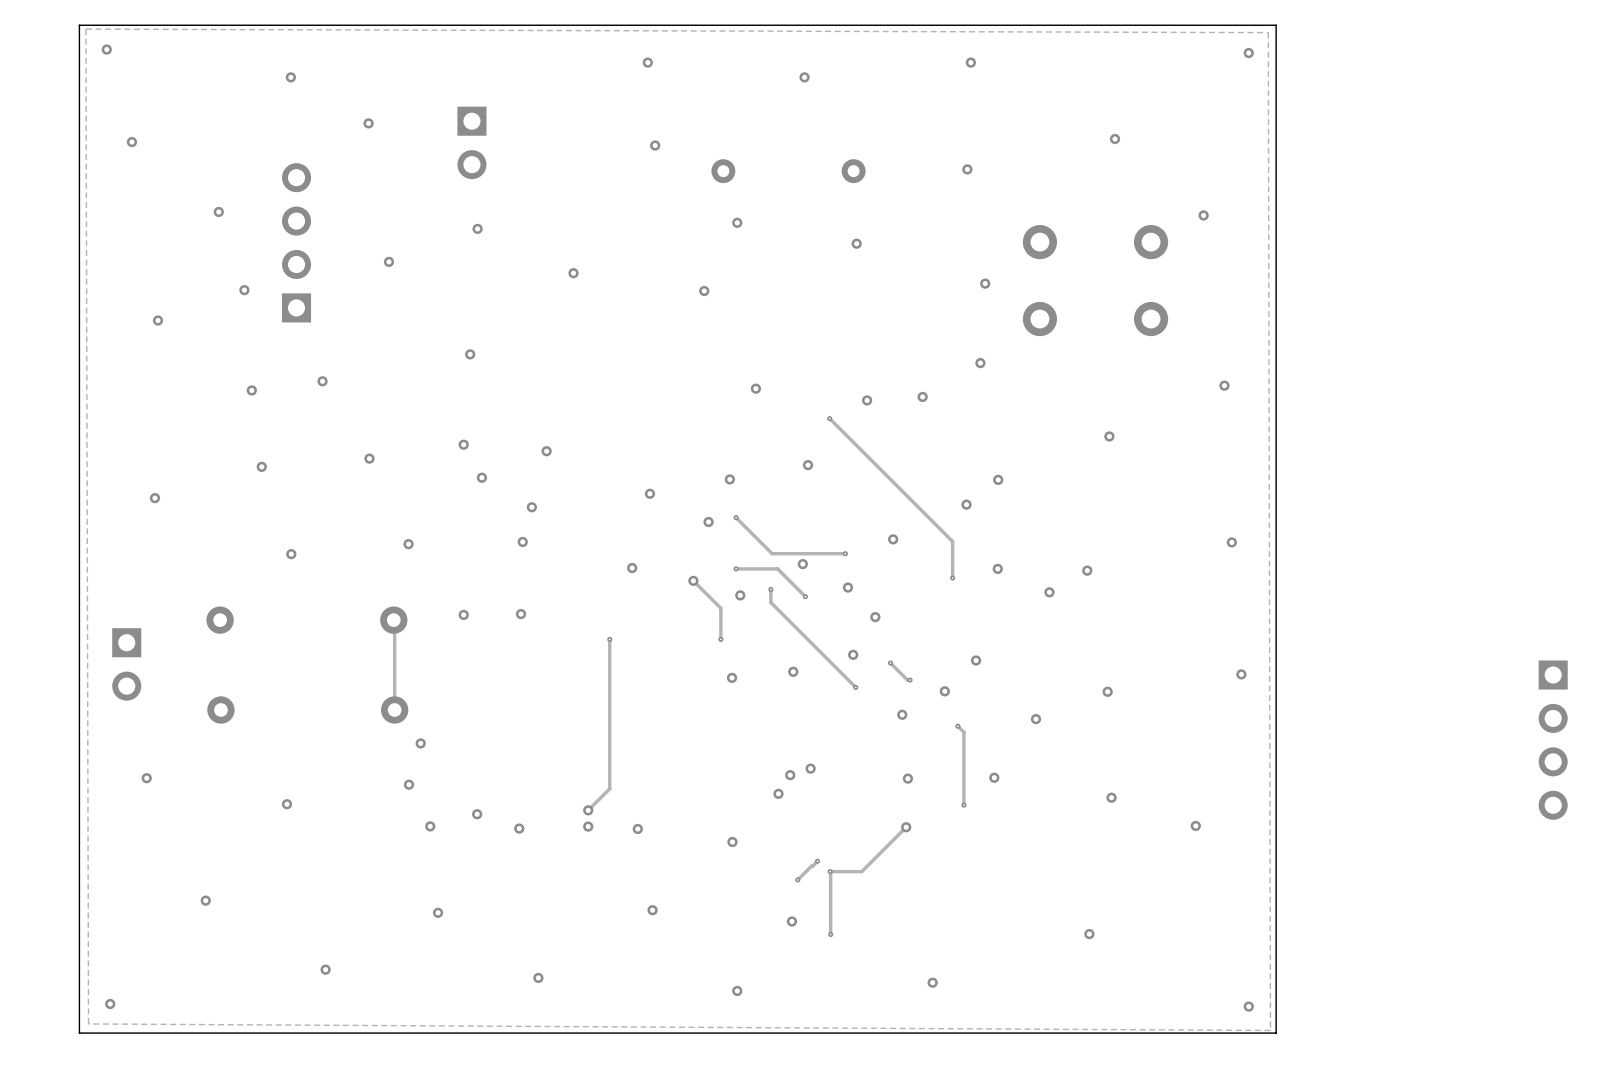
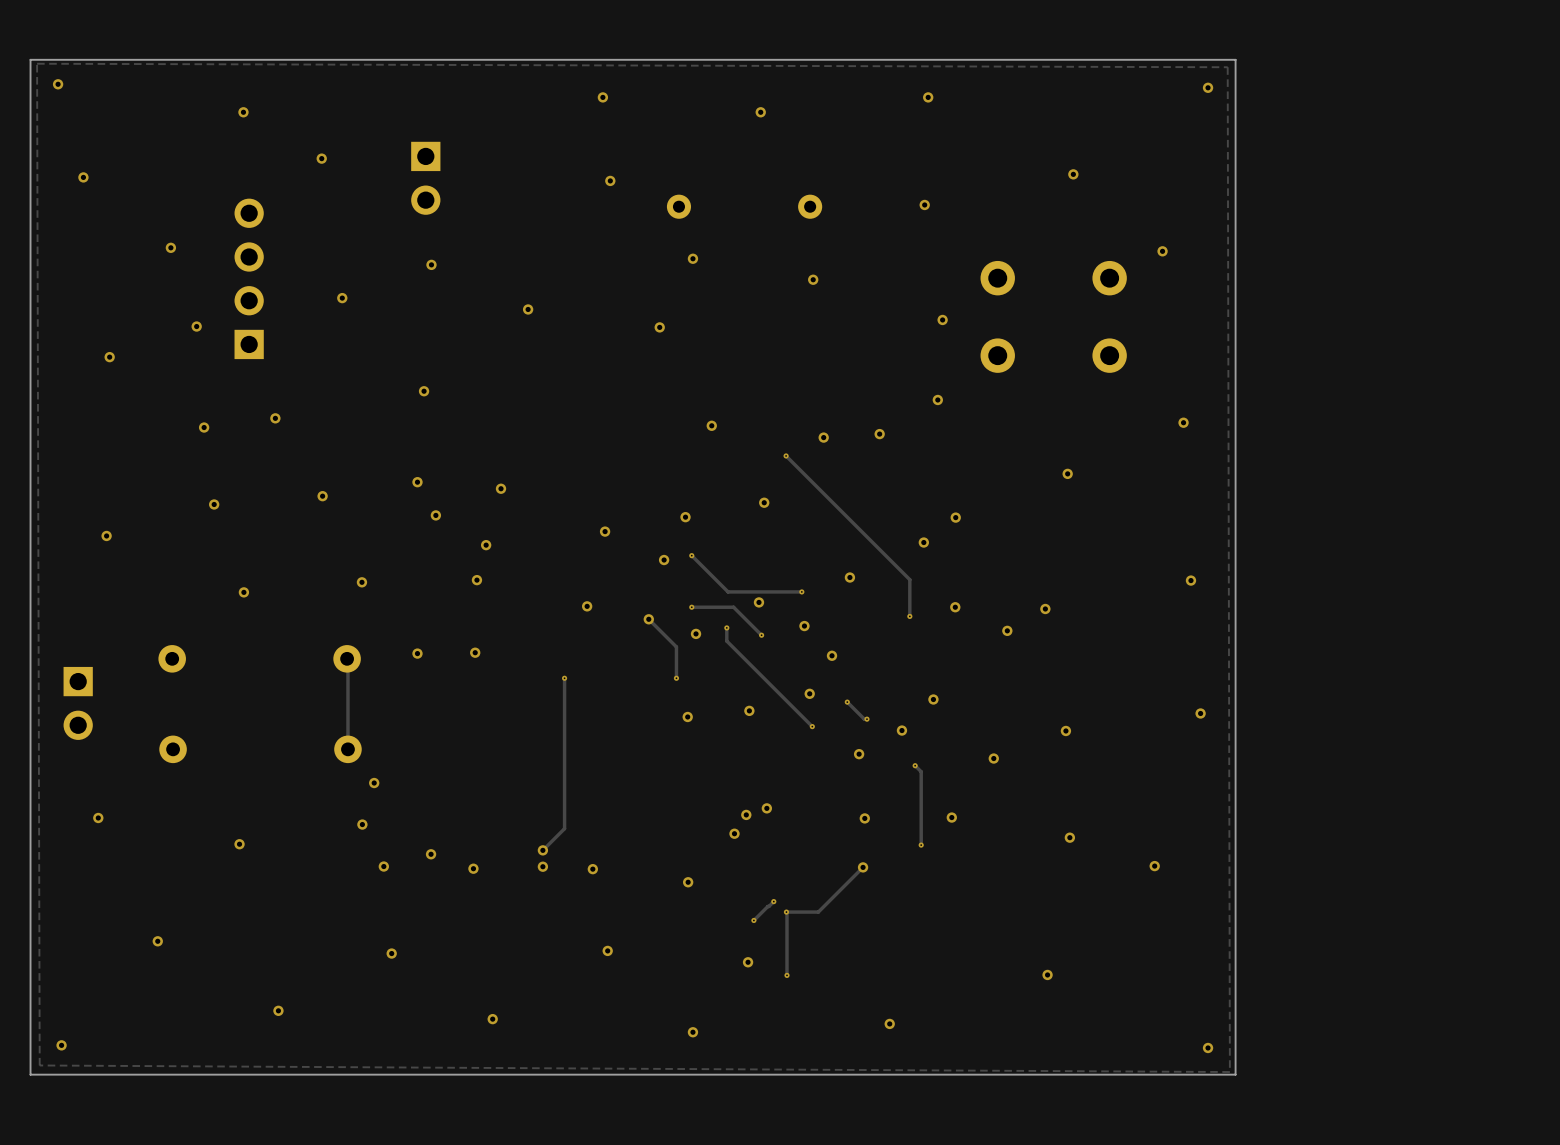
part: (1553, 740) -> none

